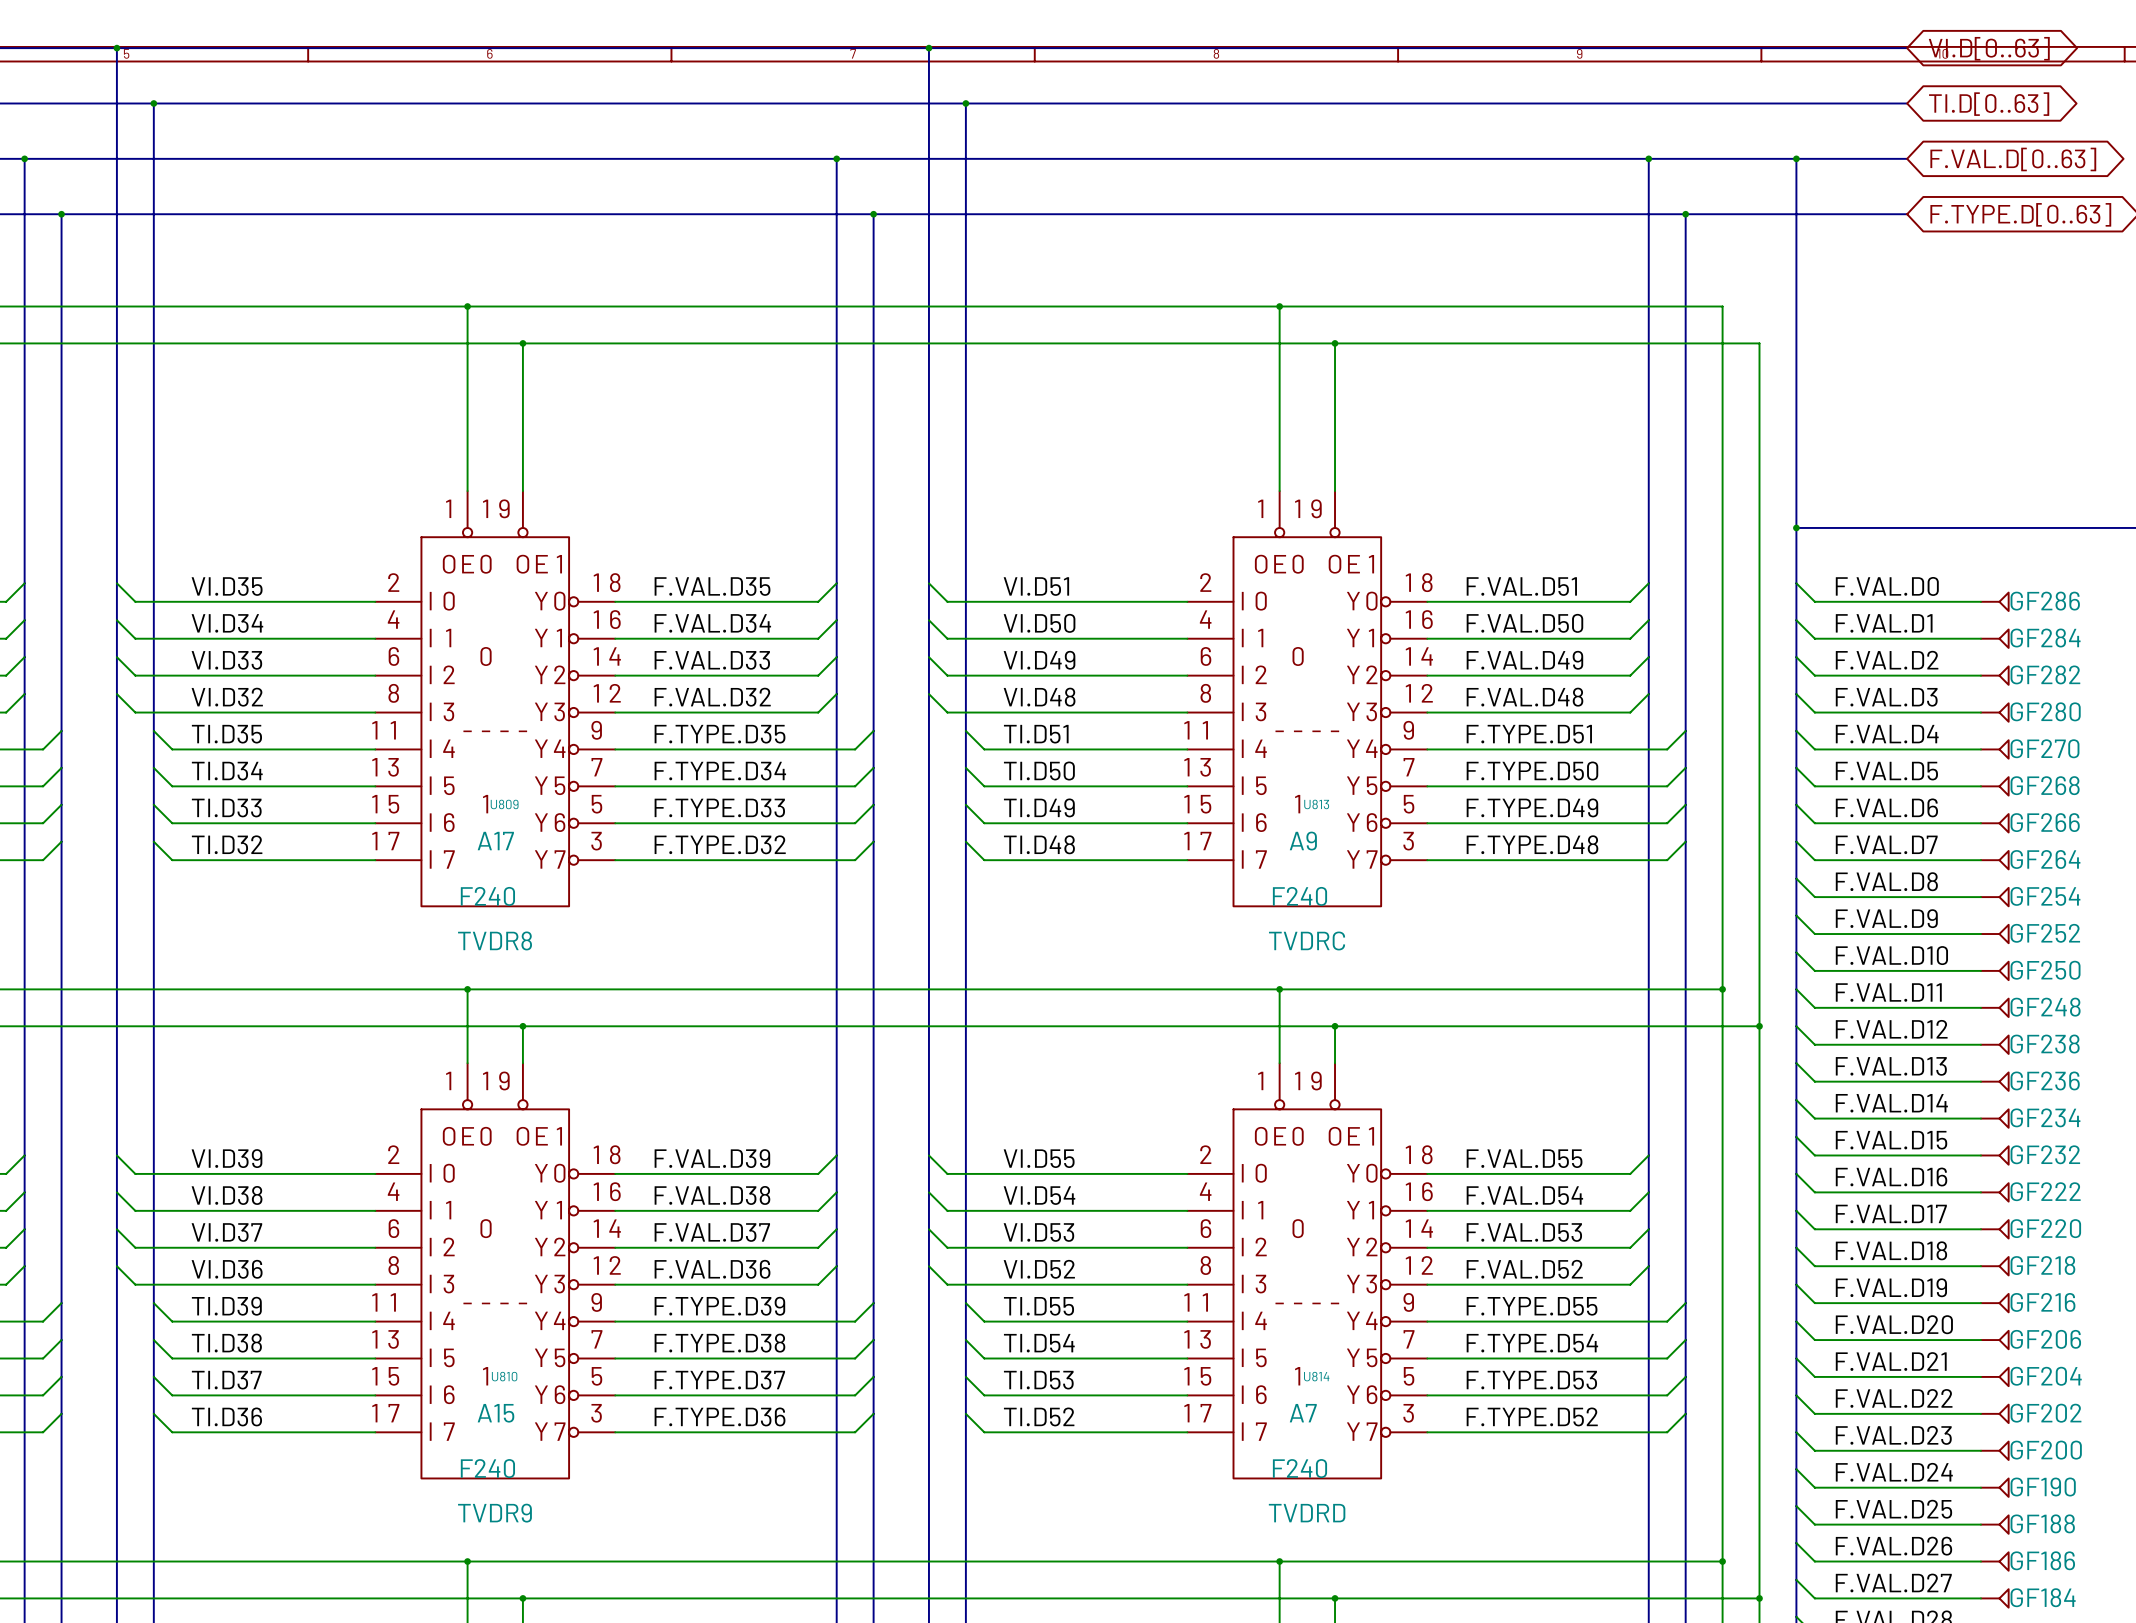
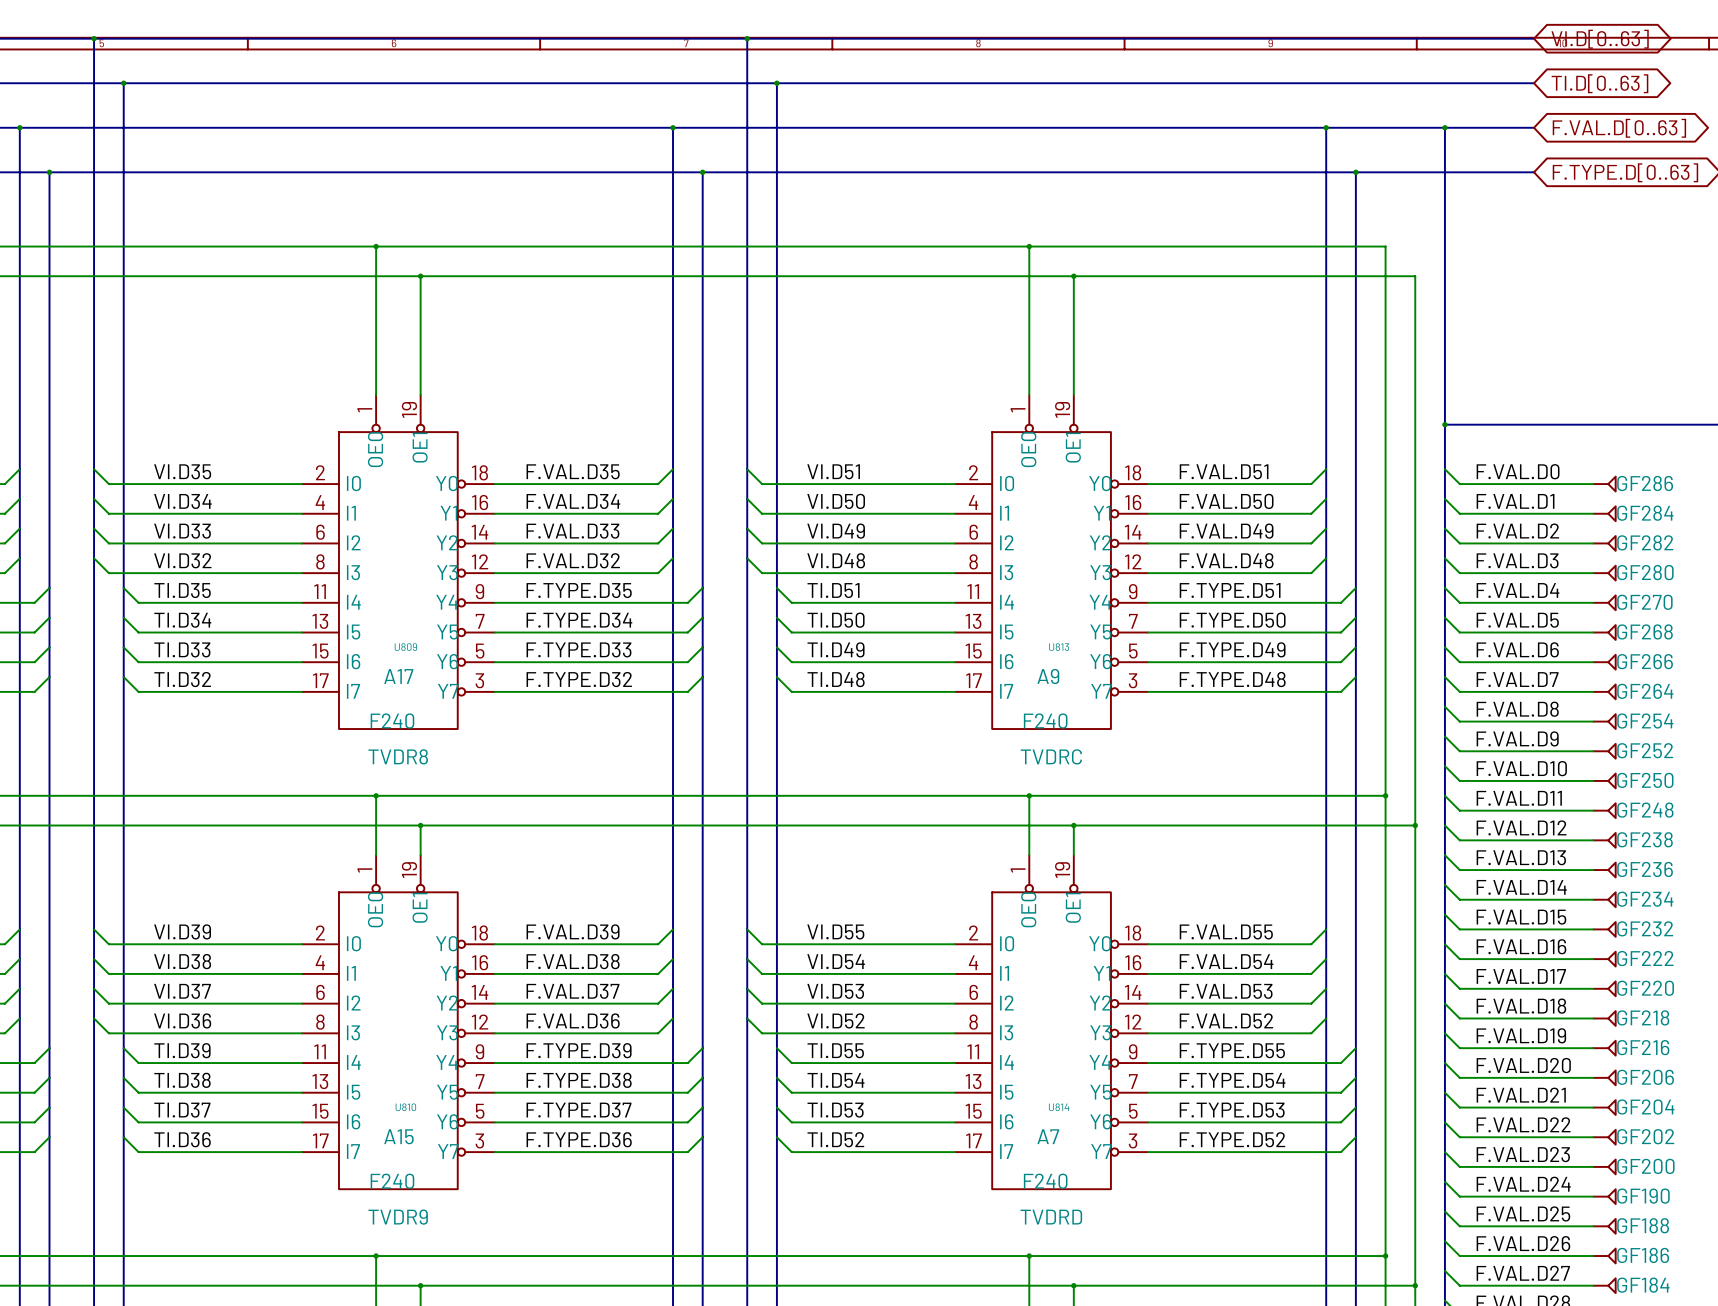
U809 symbol: [375, 491, 616, 907] -> [301, 394, 495, 730]
U813 symbol: [1187, 491, 1428, 907] -> [955, 394, 1149, 730]
U810 symbol: [375, 1063, 616, 1479] -> [301, 855, 495, 1190]
U814 symbol: [1187, 1063, 1428, 1479] -> [955, 855, 1149, 1190]

